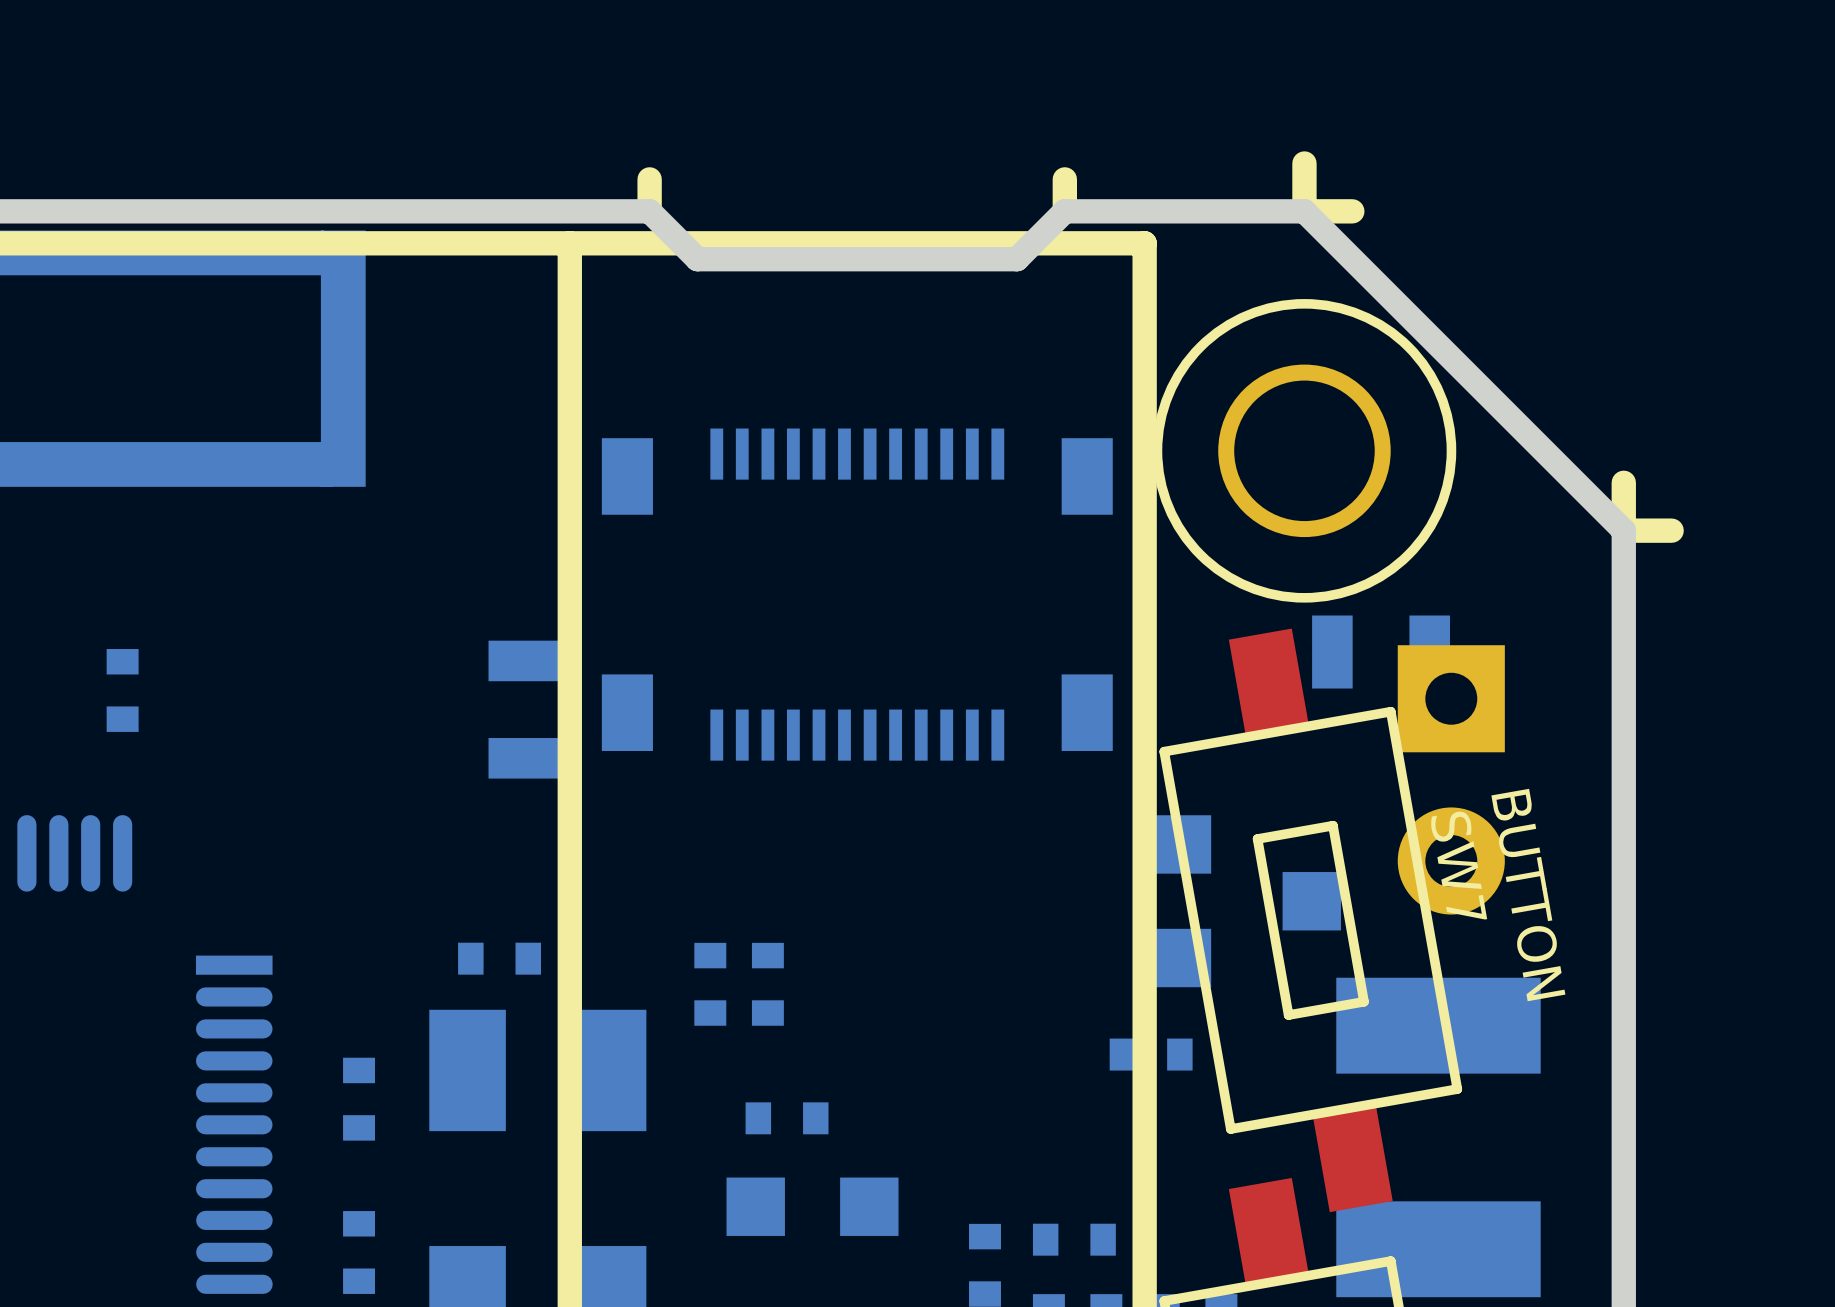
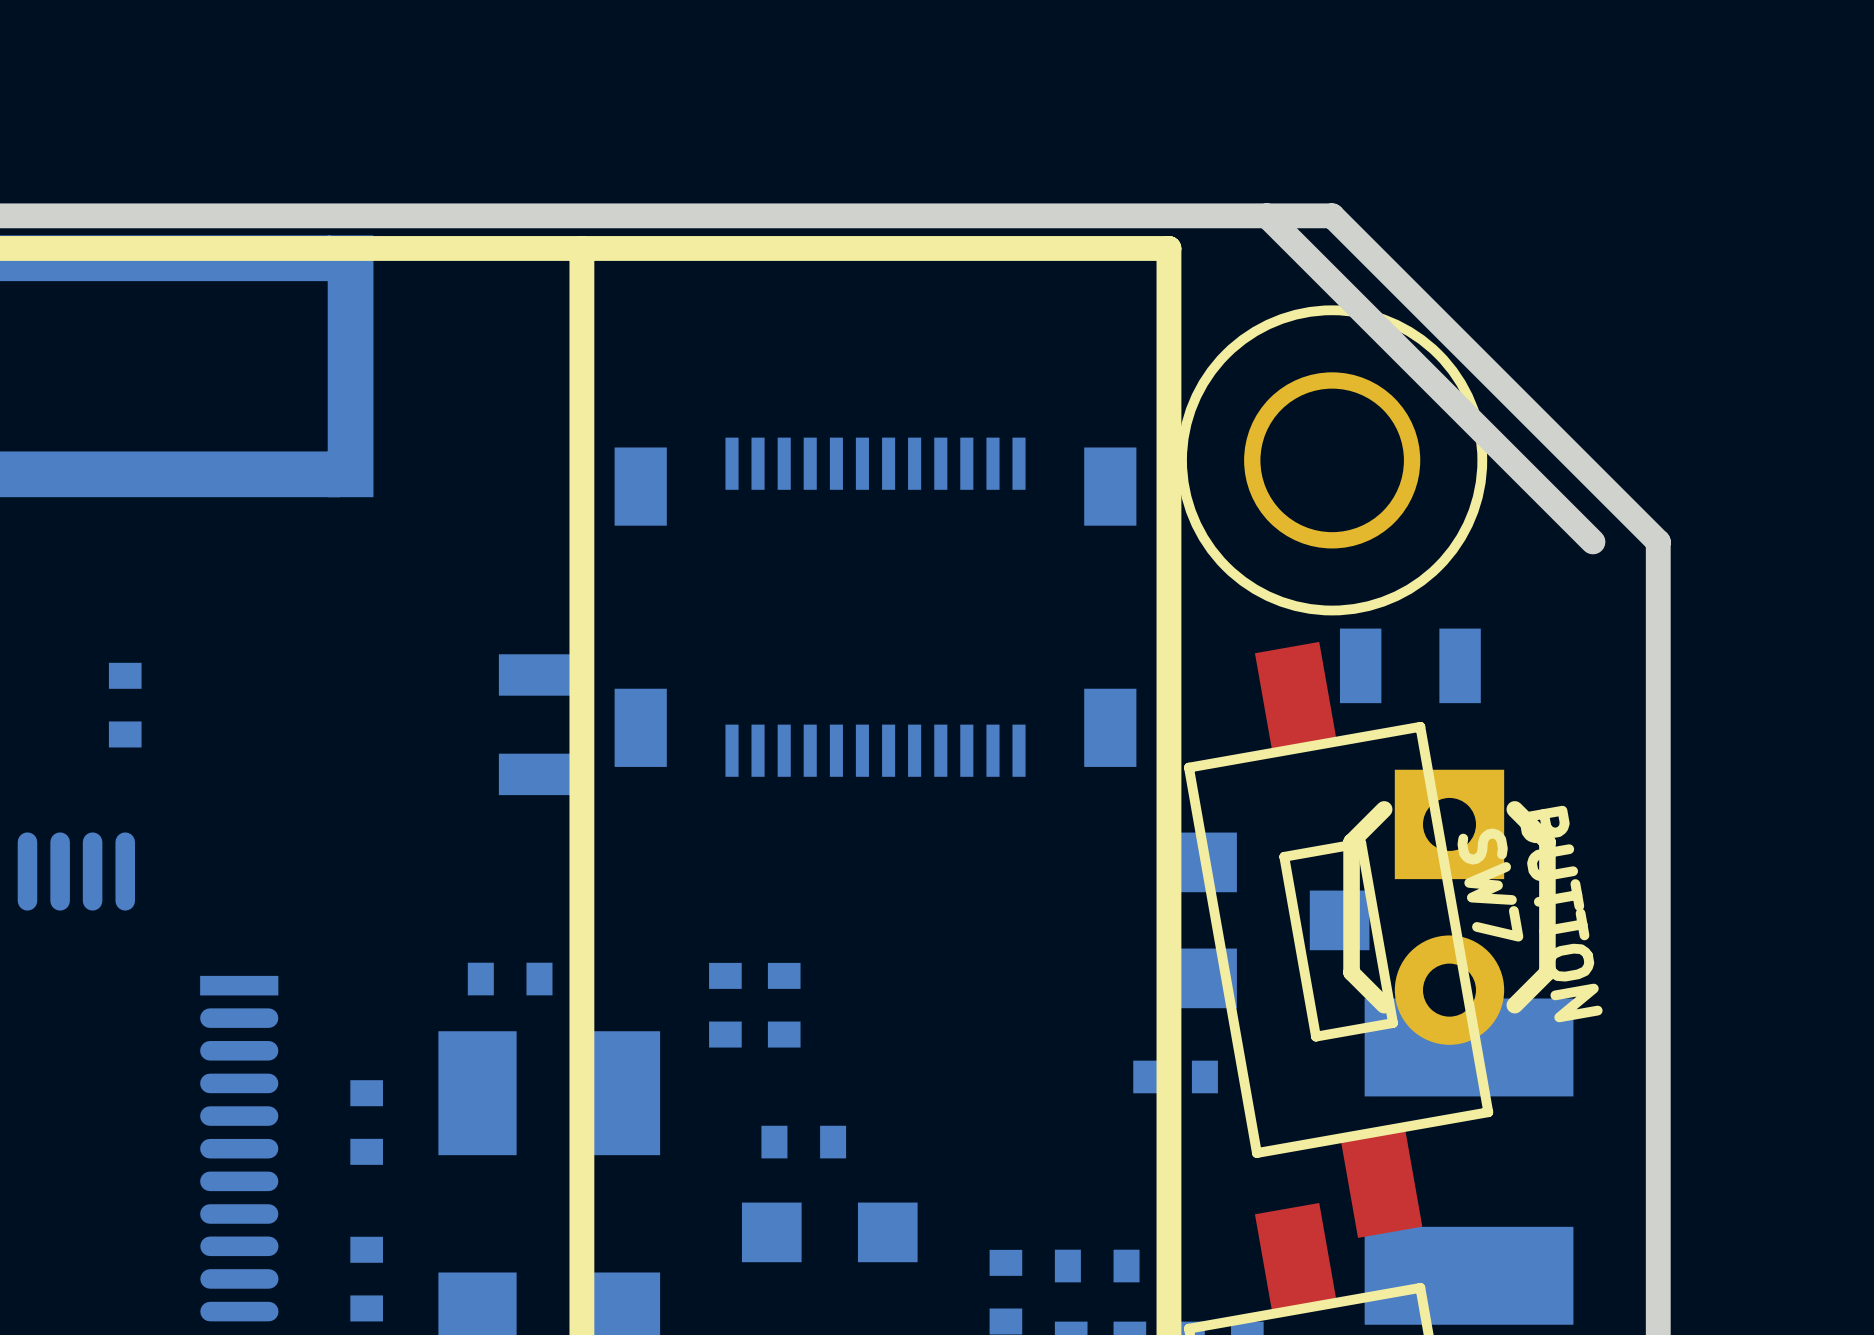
line: (1304, 163) (1304, 211) (1352, 211) -> none
line: (649, 179) (649, 211) -> none
line: (1064, 179) (1064, 211) -> none
board edge: (649, 211) (697, 259) (1016, 259) (1064, 211) -> (663, 215) (1087, 215)
board edge: none -> (1266, 215) (1592, 541)
line: (1623, 482) (1623, 530) (1671, 530) -> none
part side: bottom (1451, 779) -> top (1449, 907)

